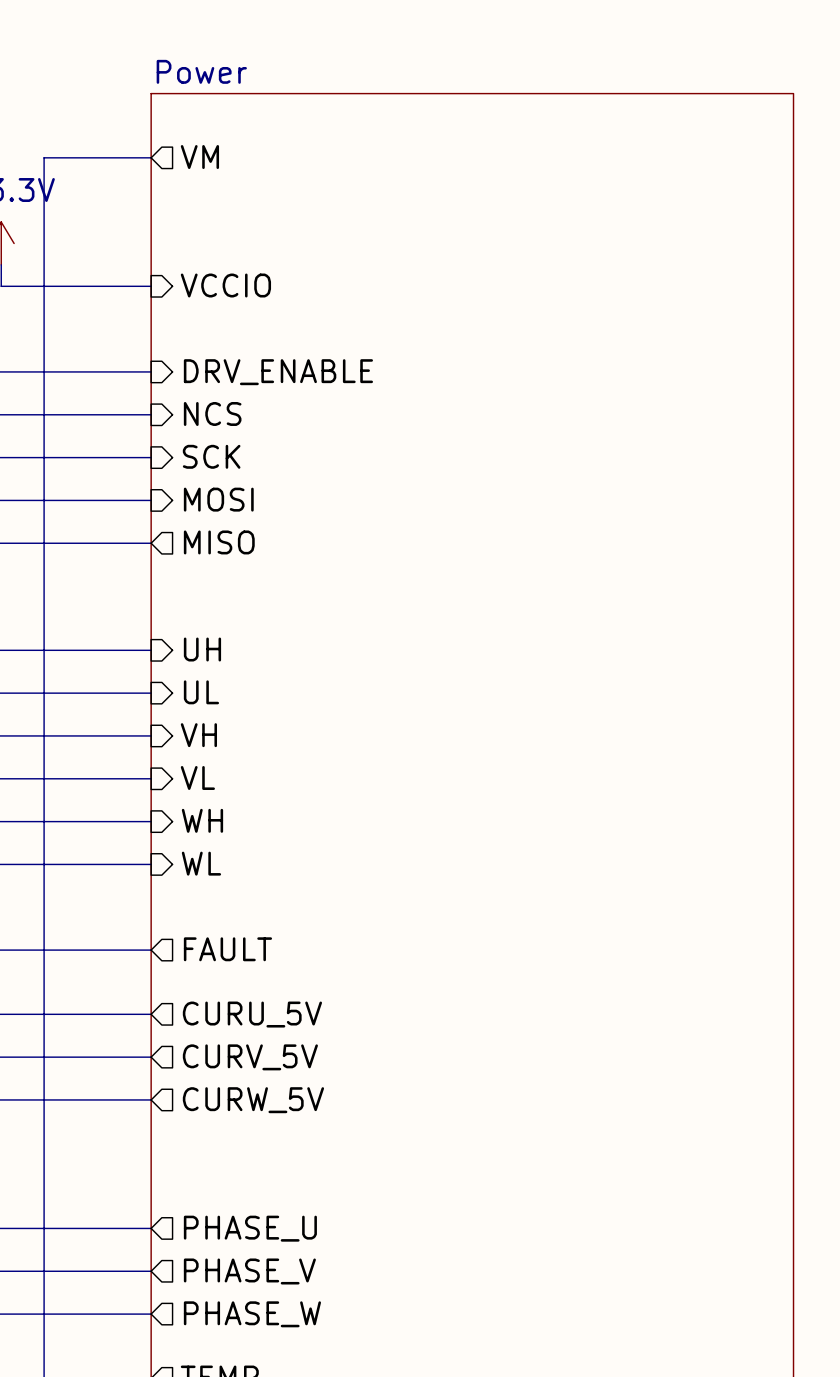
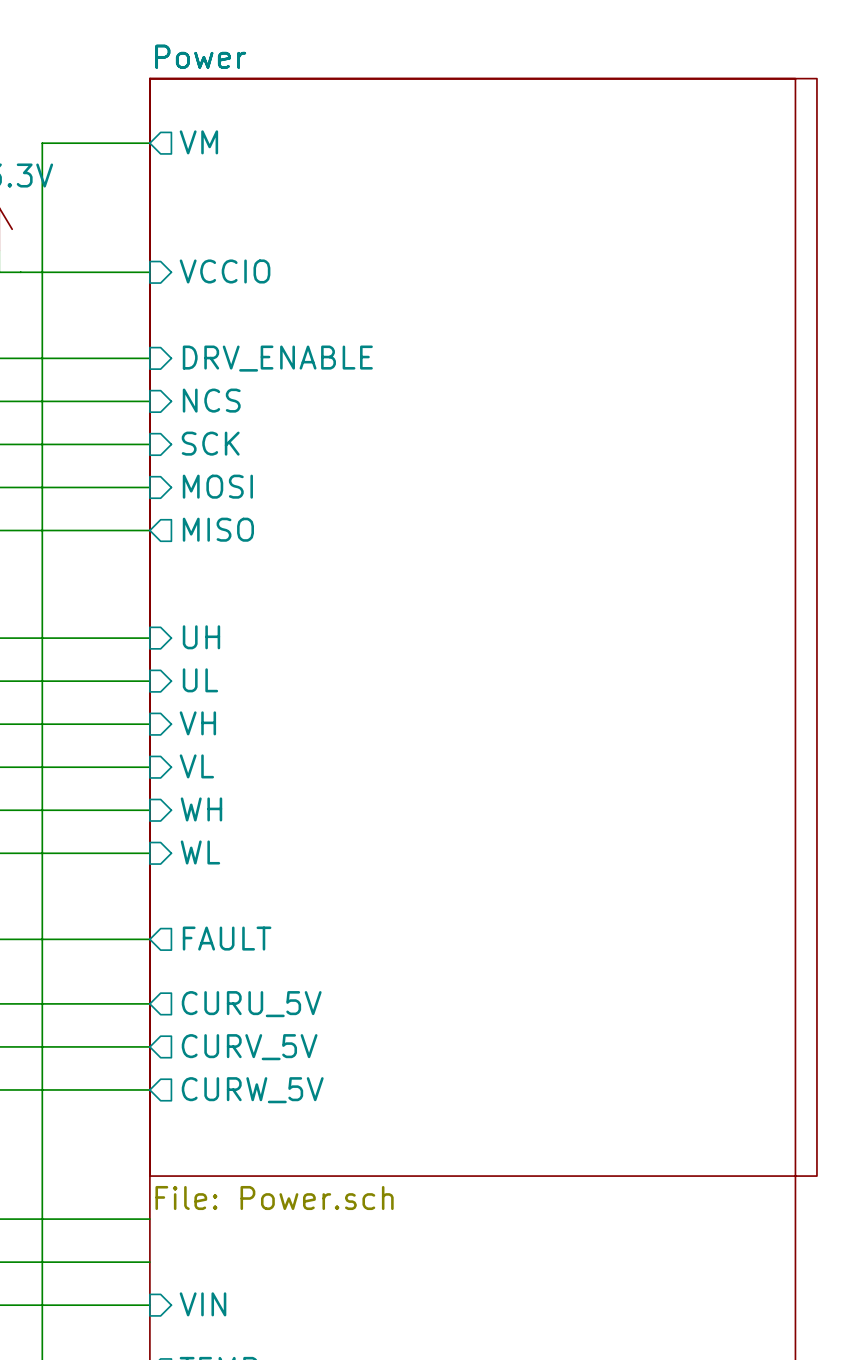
sheet Power: none -> File: Power.sch (483, 627)
sheet pin: PHASE_U (250, 1228) -> none
sheet pin: PHASE_V (249, 1271) -> none
sheet pin shape: output (252, 1314) -> input (203, 1304)
sheet pin: PHASE_W (252, 1314) -> VIN (203, 1304)

